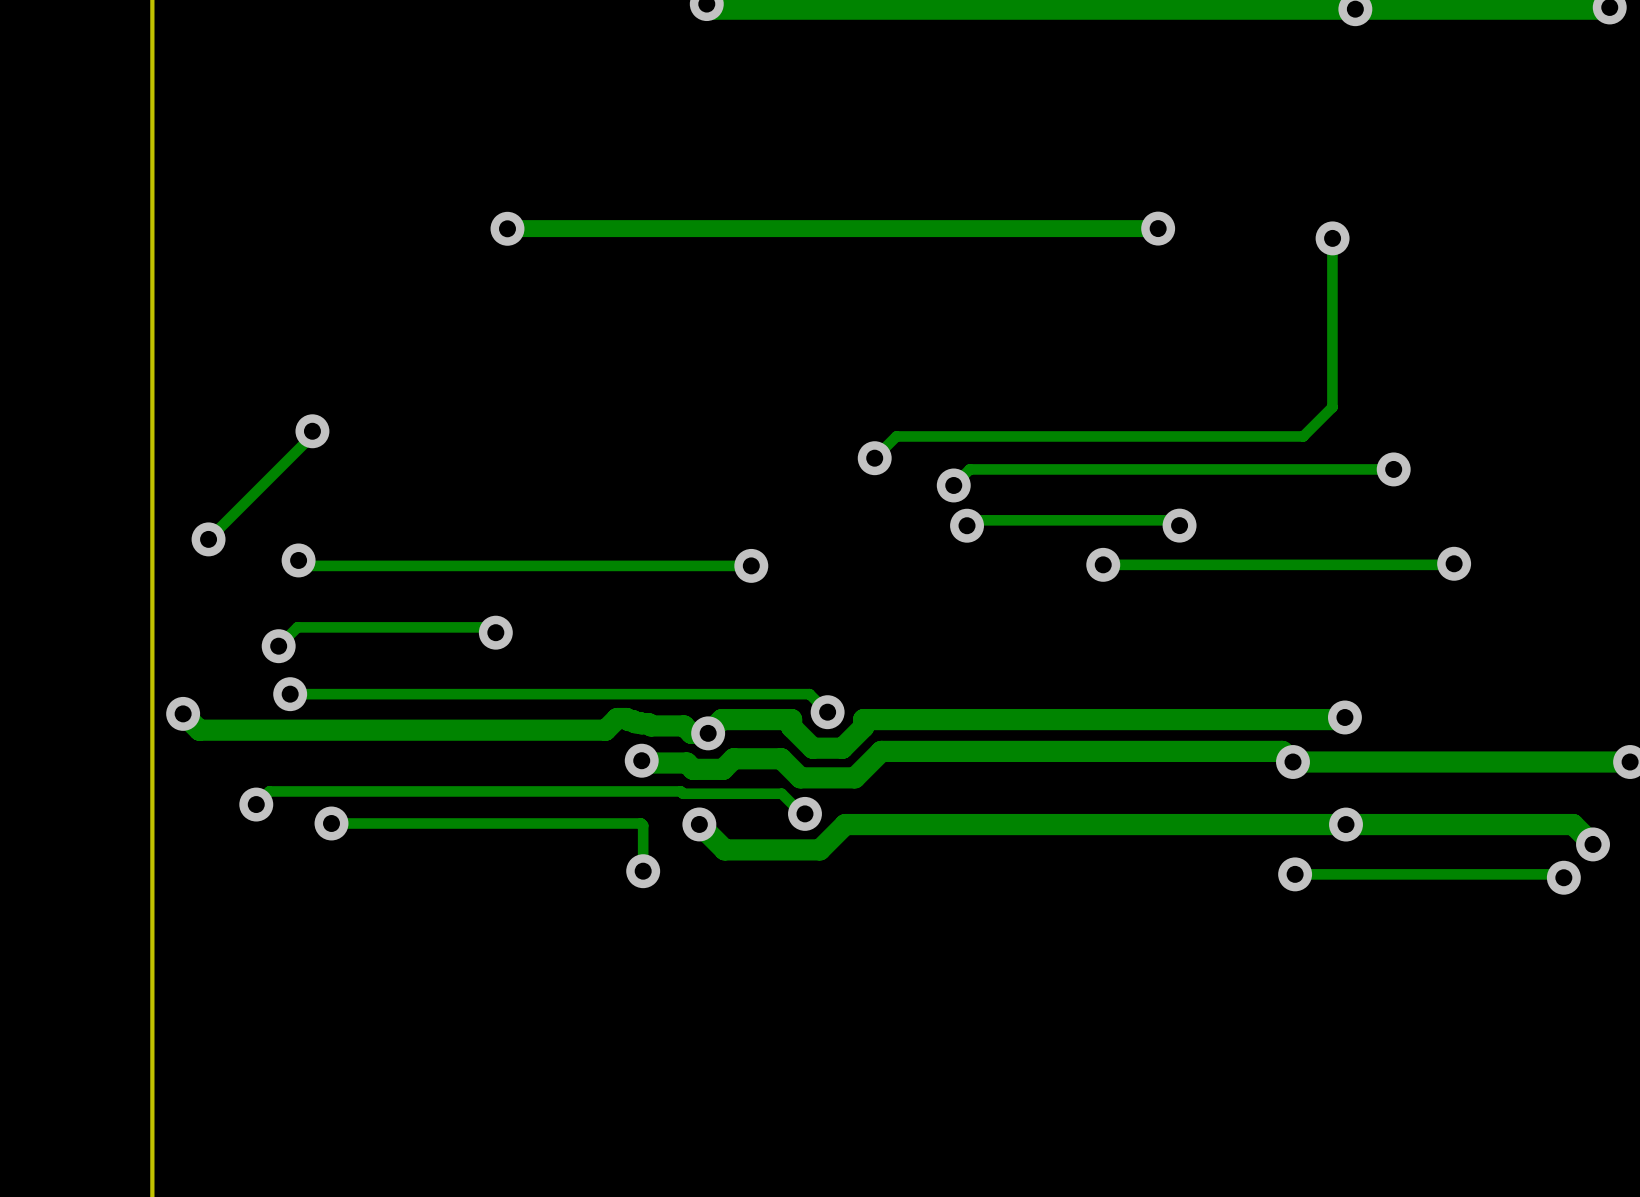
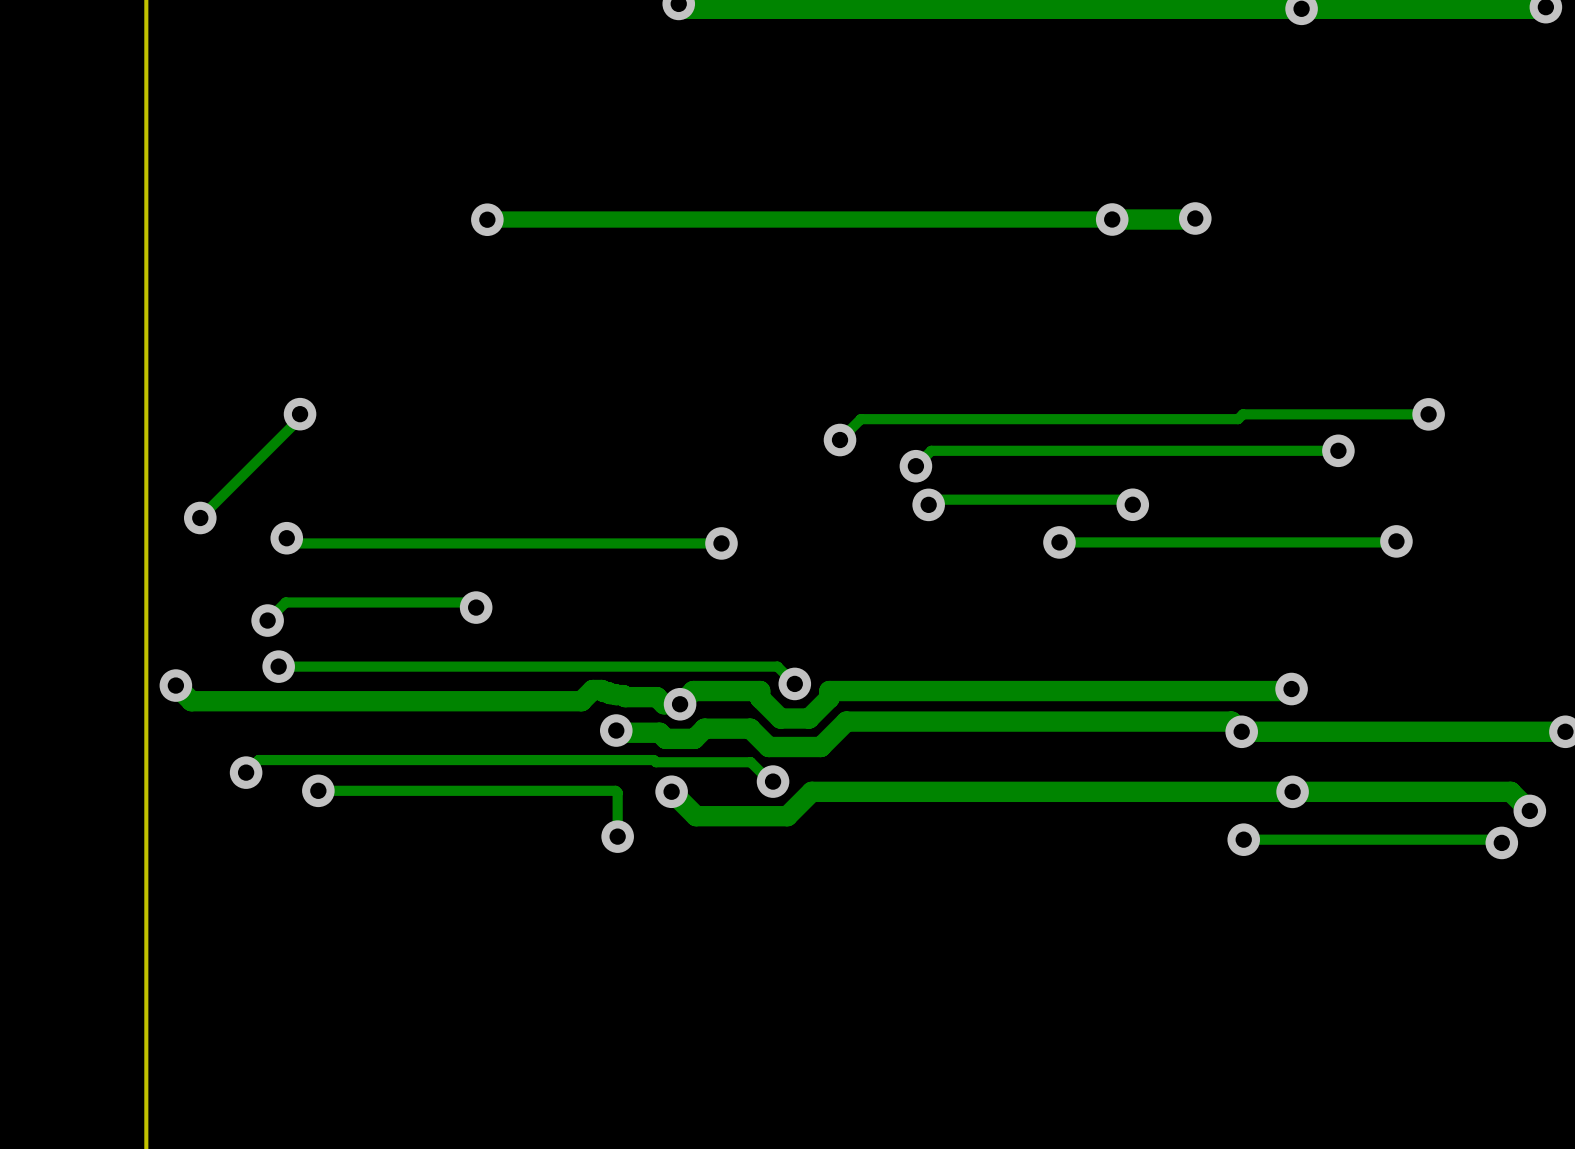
track: none -> (1195, 218) (1112, 219)
track: (1332, 238) (1332, 407) (1303, 436) (1289, 436) -> (1428, 414) (1242, 414) (1238, 419)
via position: (1332, 238) -> (1195, 218)
via: none -> (1428, 414)

